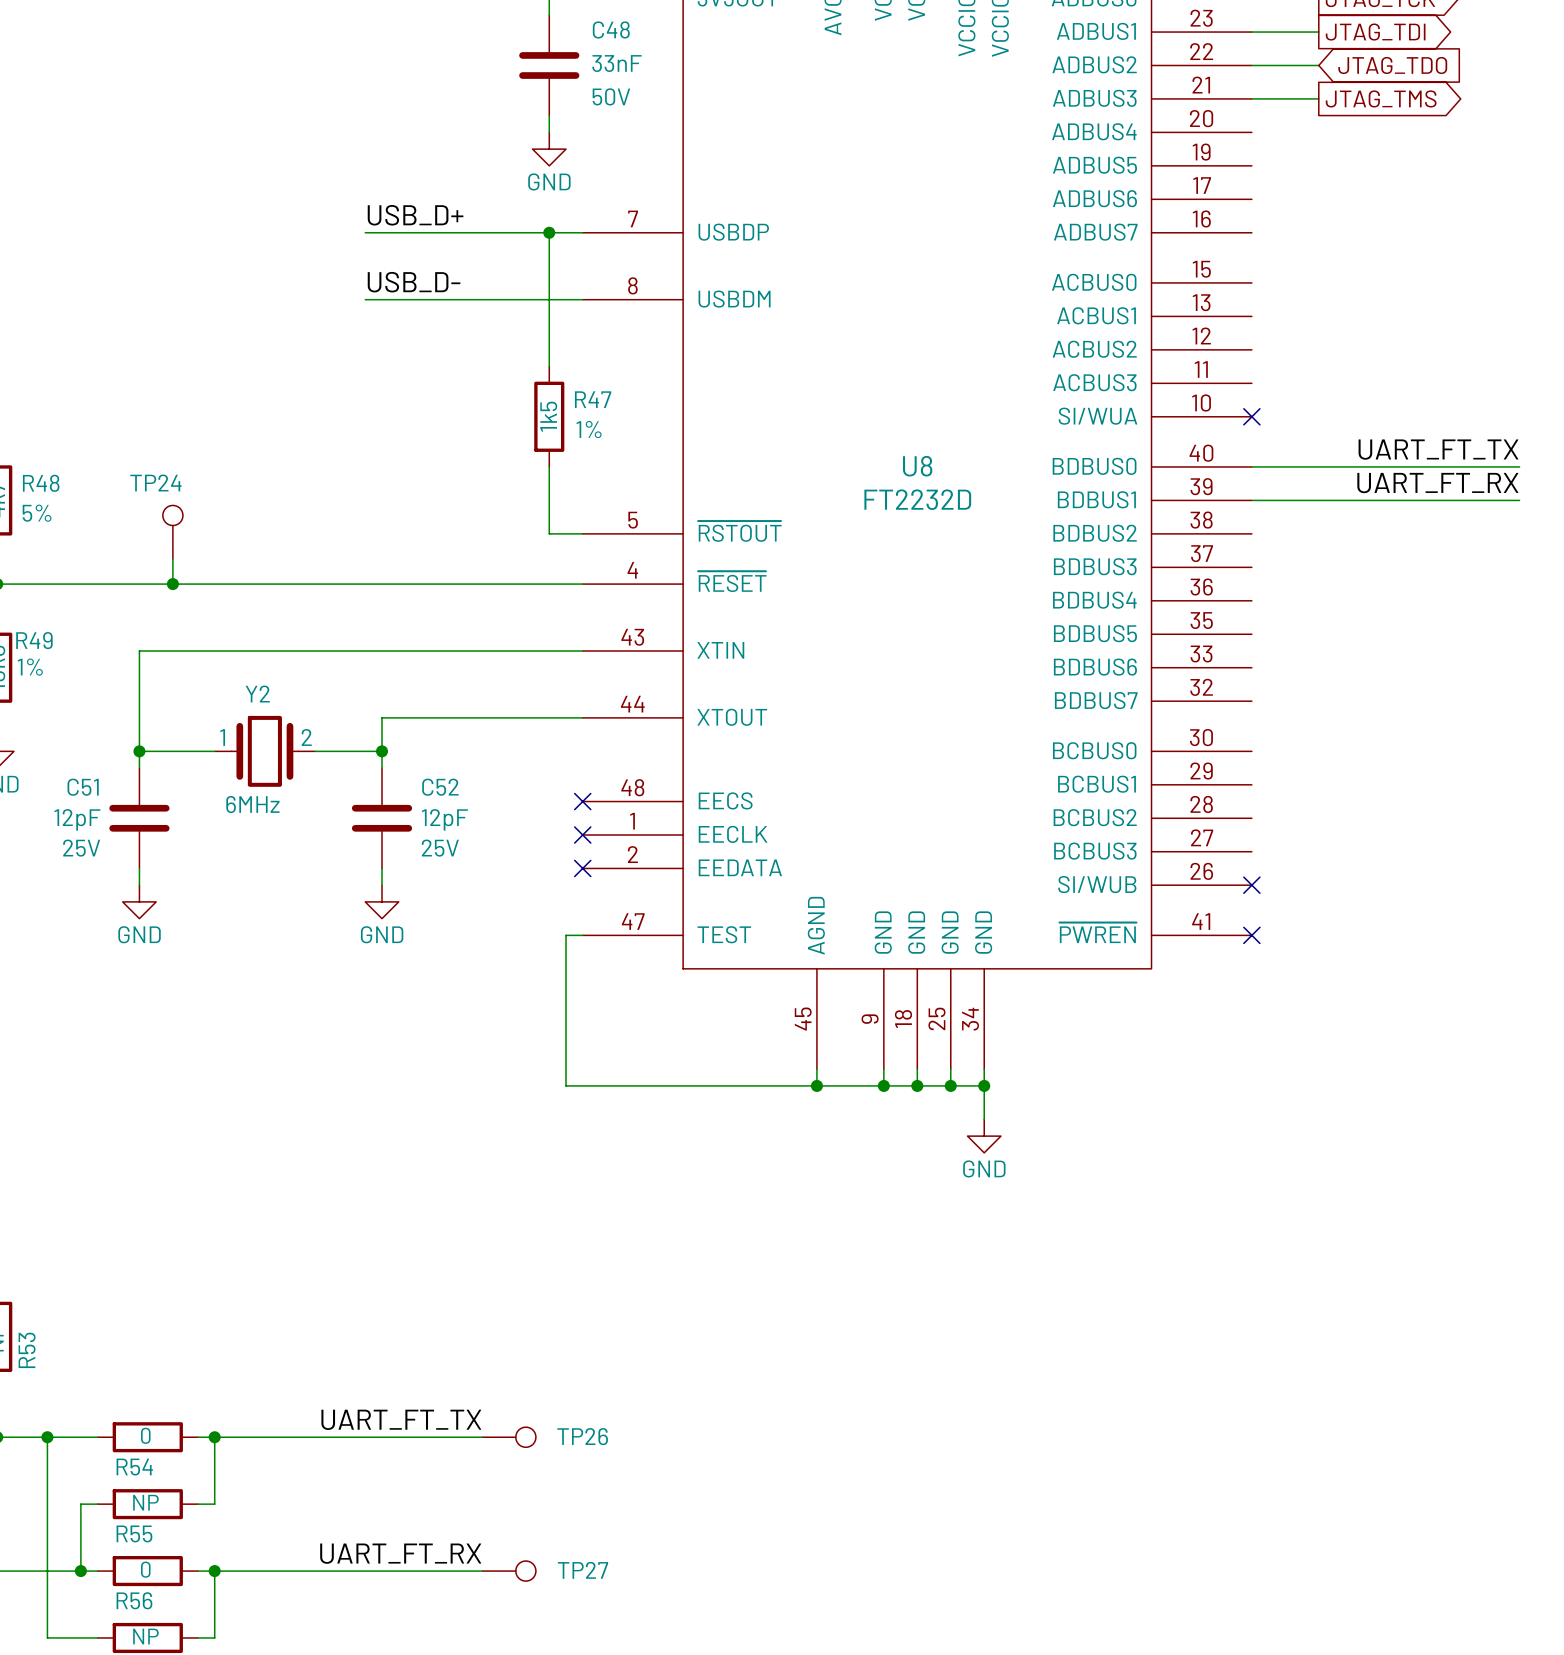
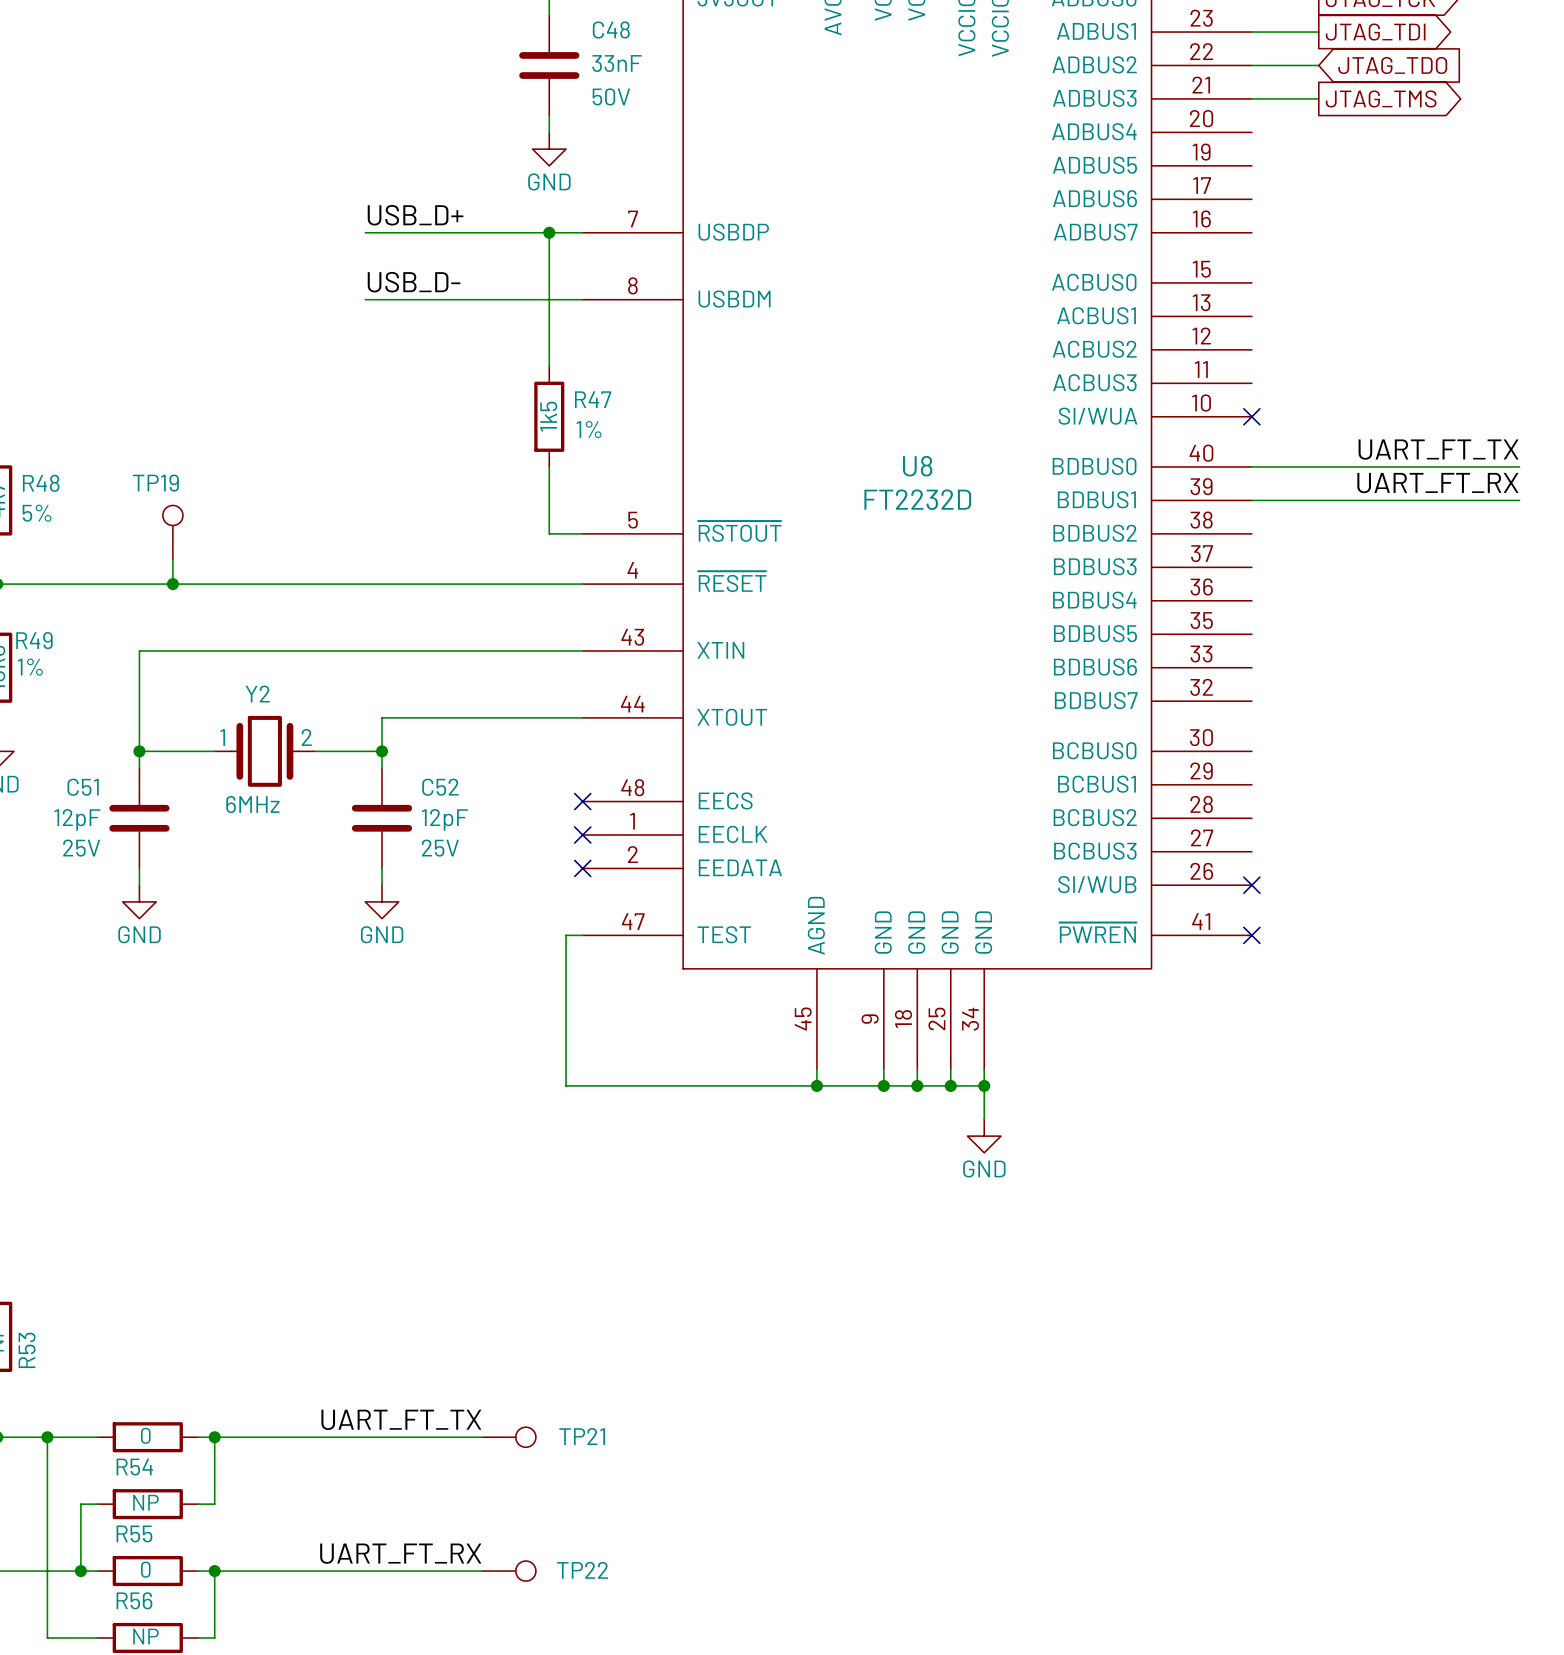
TP24 name: TP24 (155, 482) -> TP19 (155, 483)
TP26 name: TP26 (582, 1436) -> TP21 (582, 1436)
TP27 name: TP27 (582, 1570) -> TP22 (582, 1570)

